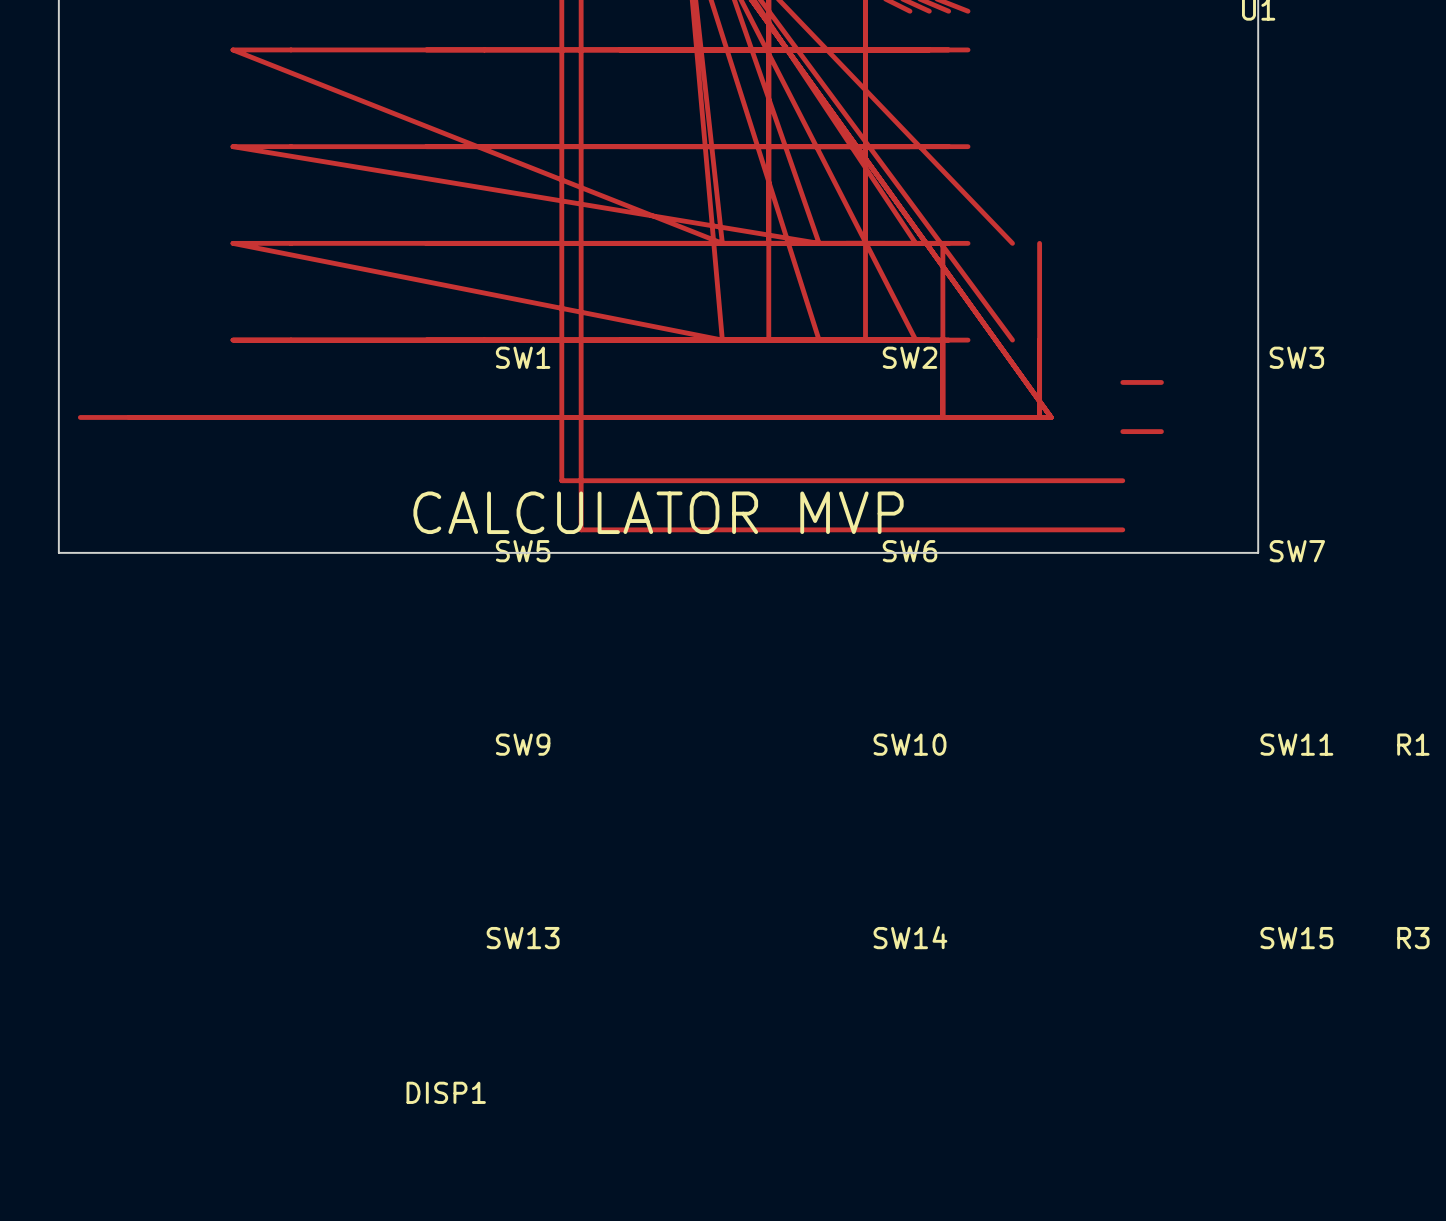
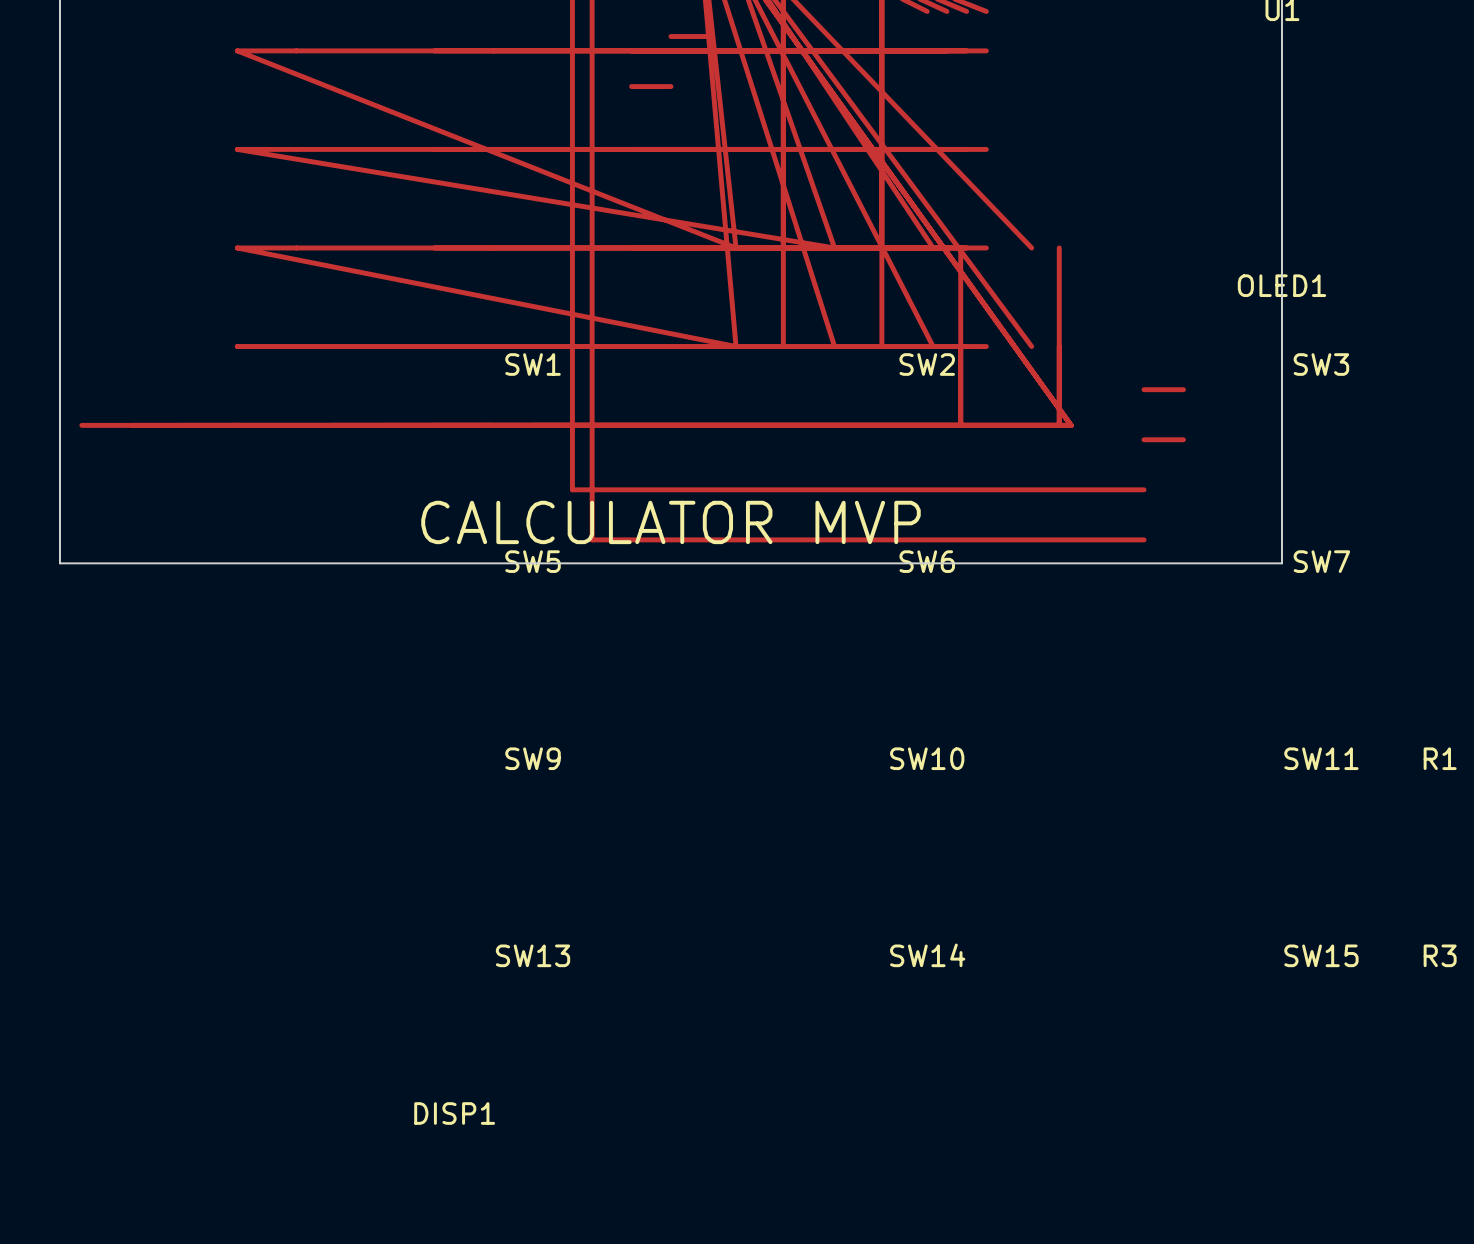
track: none -> (670, 36) (710, 36)
track: none -> (631, 86) (670, 86)
OLED1: none -> (1281, 285)

